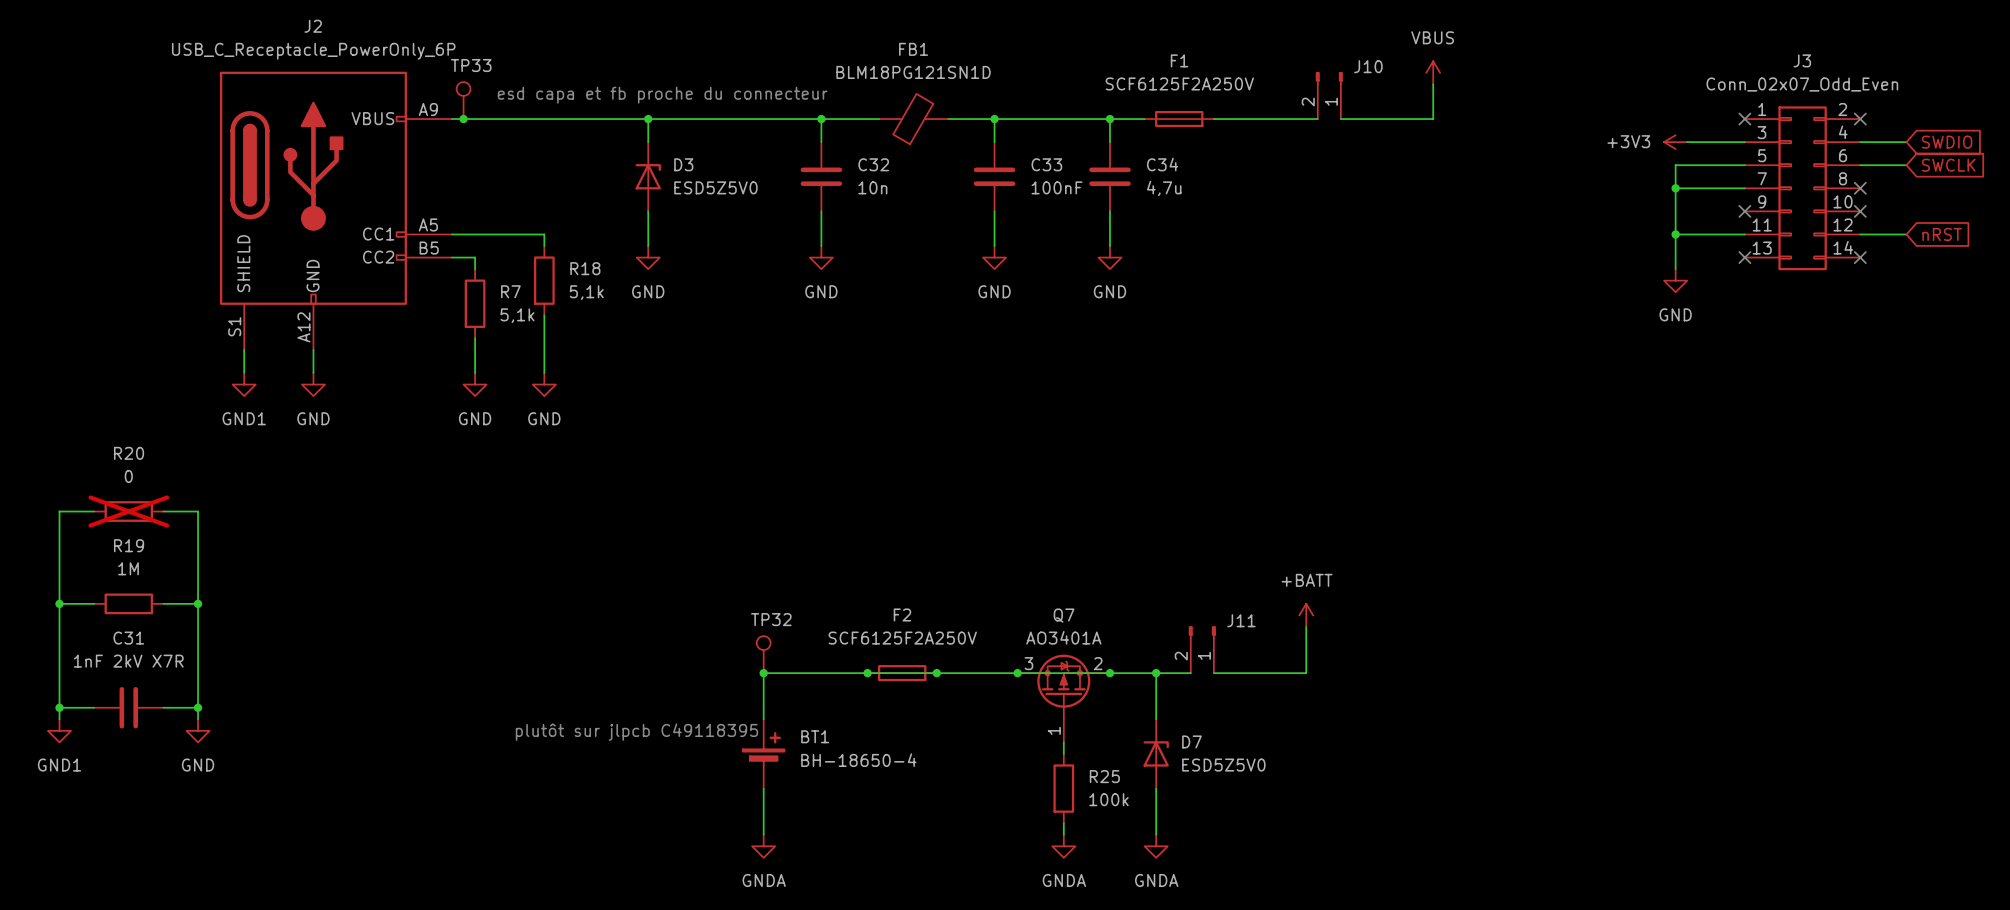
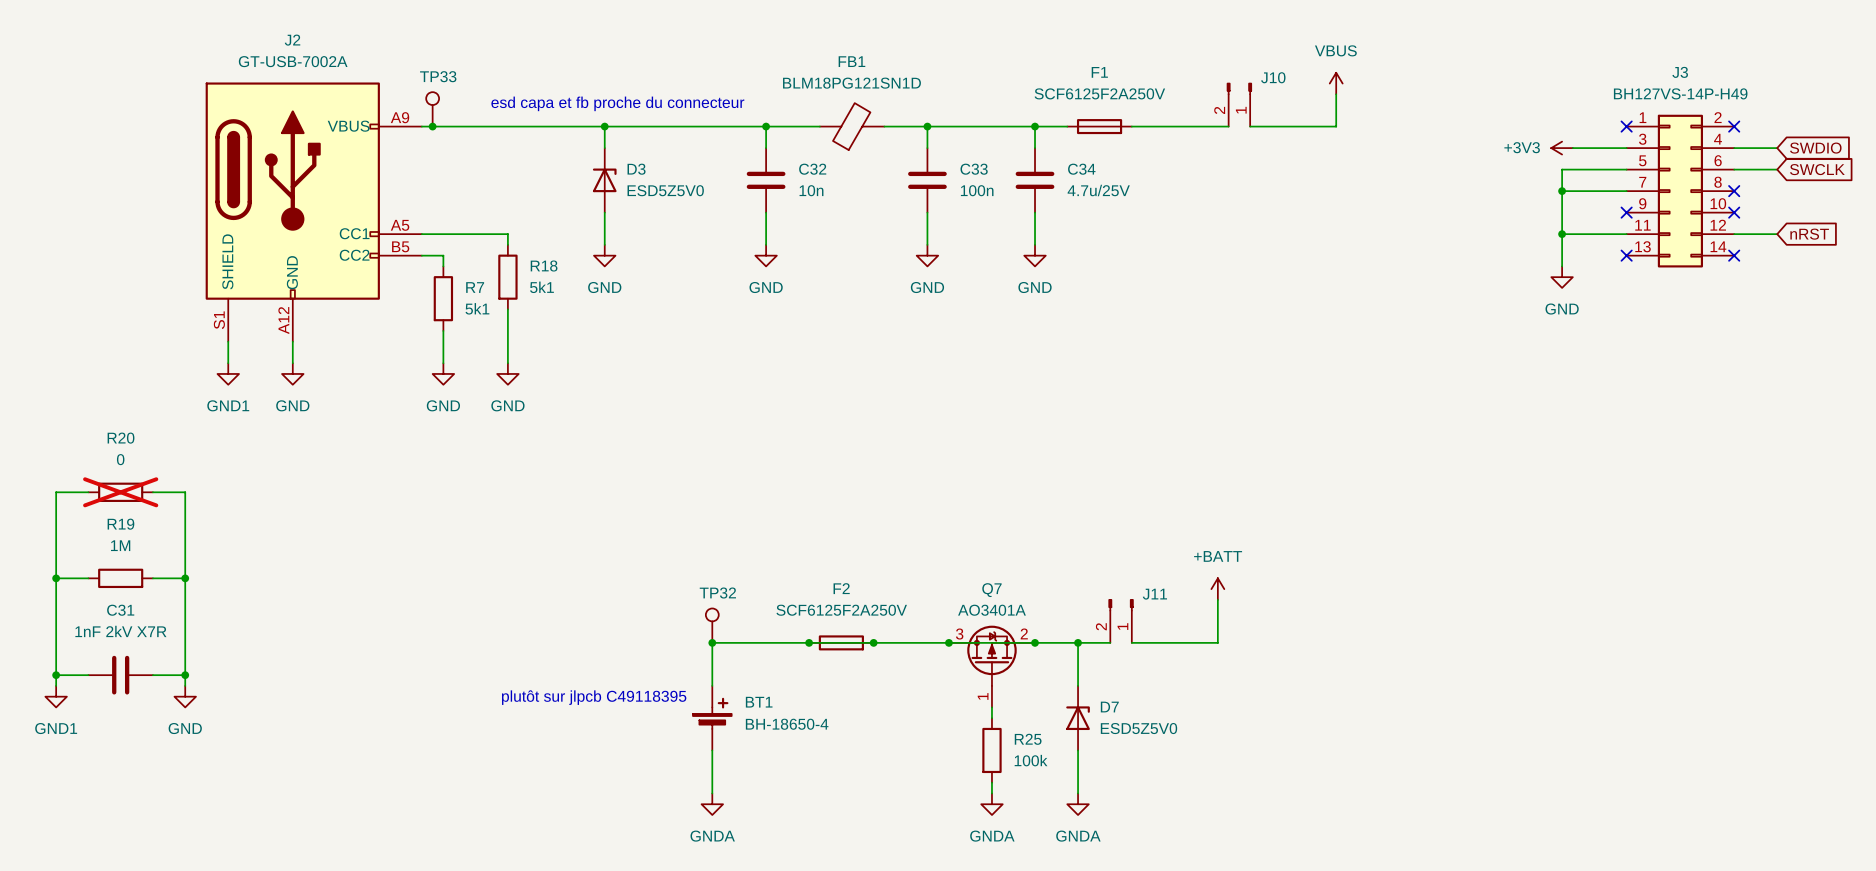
J2 value: USB_C_Receptacle_PowerOnly_6P (313, 51) -> GT-USB-7002A (293, 61)
J3 value: Conn_02x07_Odd_Even (1802, 84) -> BH127VS-14P-H49 (1680, 93)
C33 value: 100nF (1057, 187) -> 100n (977, 190)
C34 value: 4,7u (1164, 188) -> 4.7u/25V (1098, 190)
R18 value: 5,1k (586, 292) -> 5k1 (541, 287)
R7 value: 5,1k (517, 315) -> 5k1 (477, 308)

